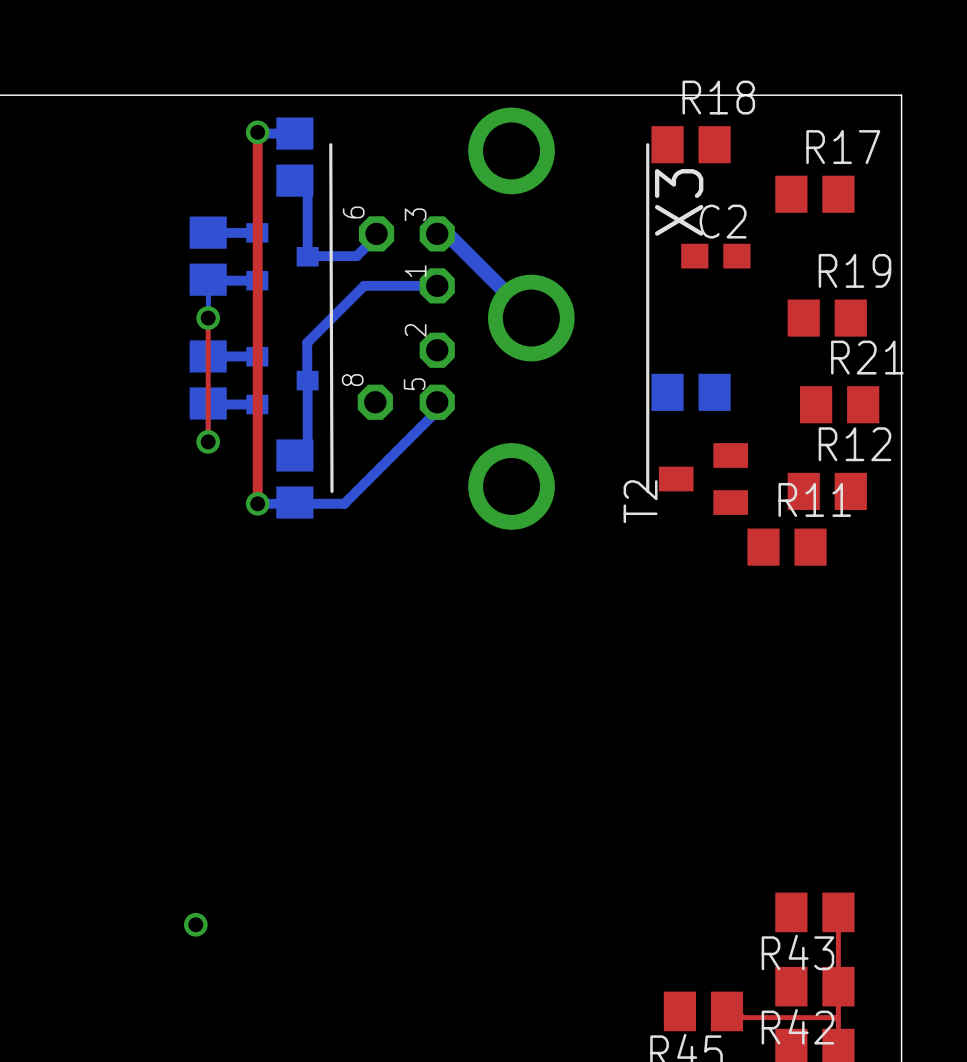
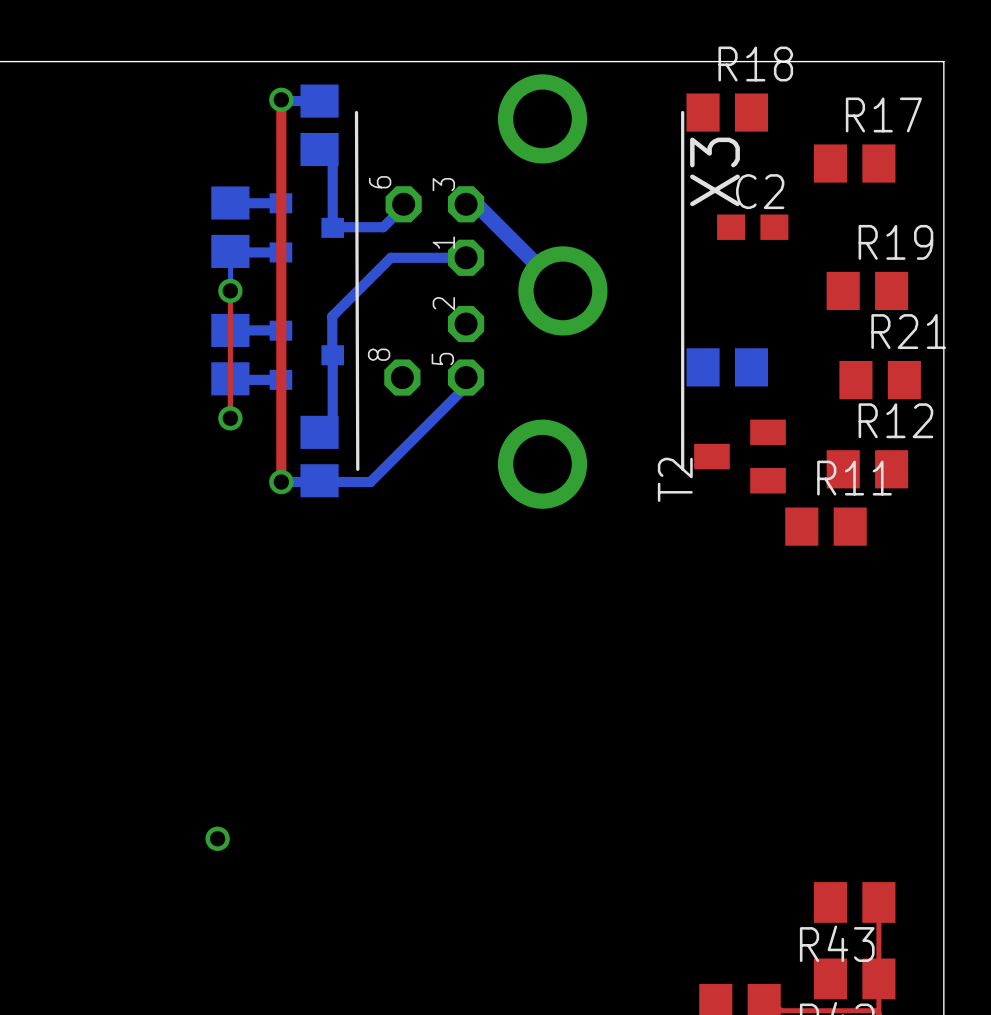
via position: (195, 924) -> (217, 838)

